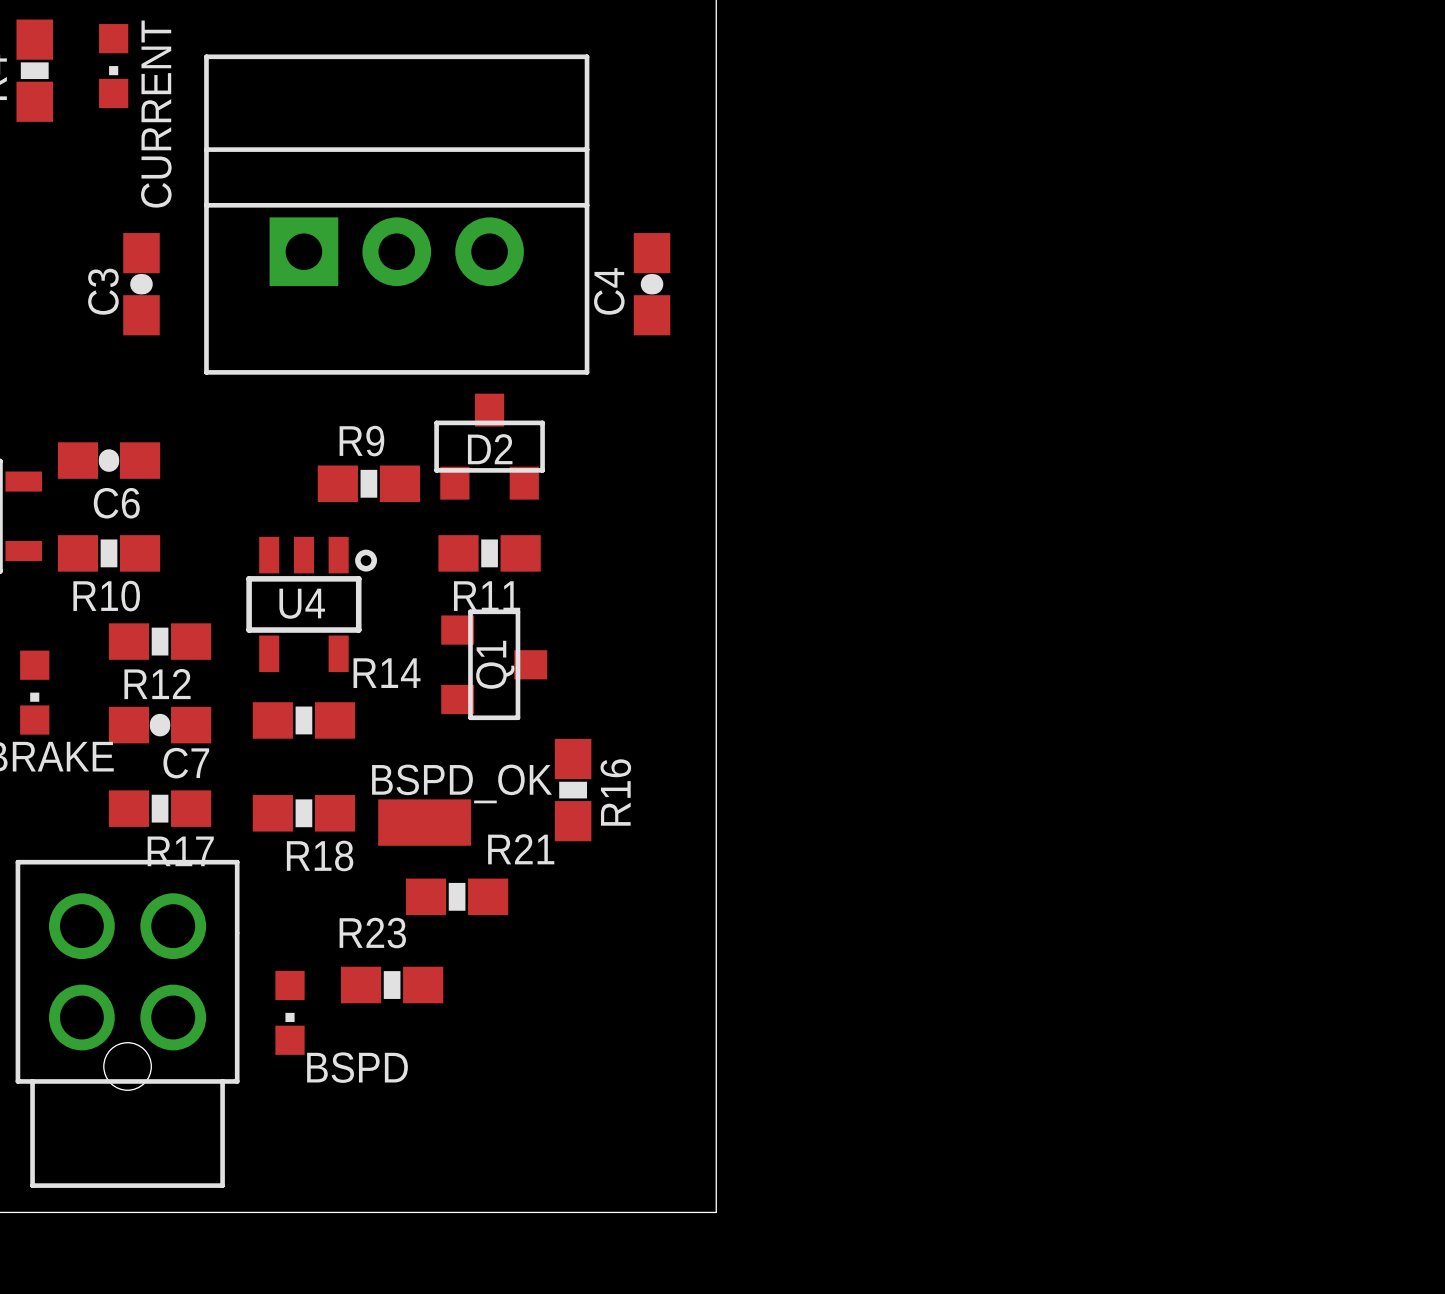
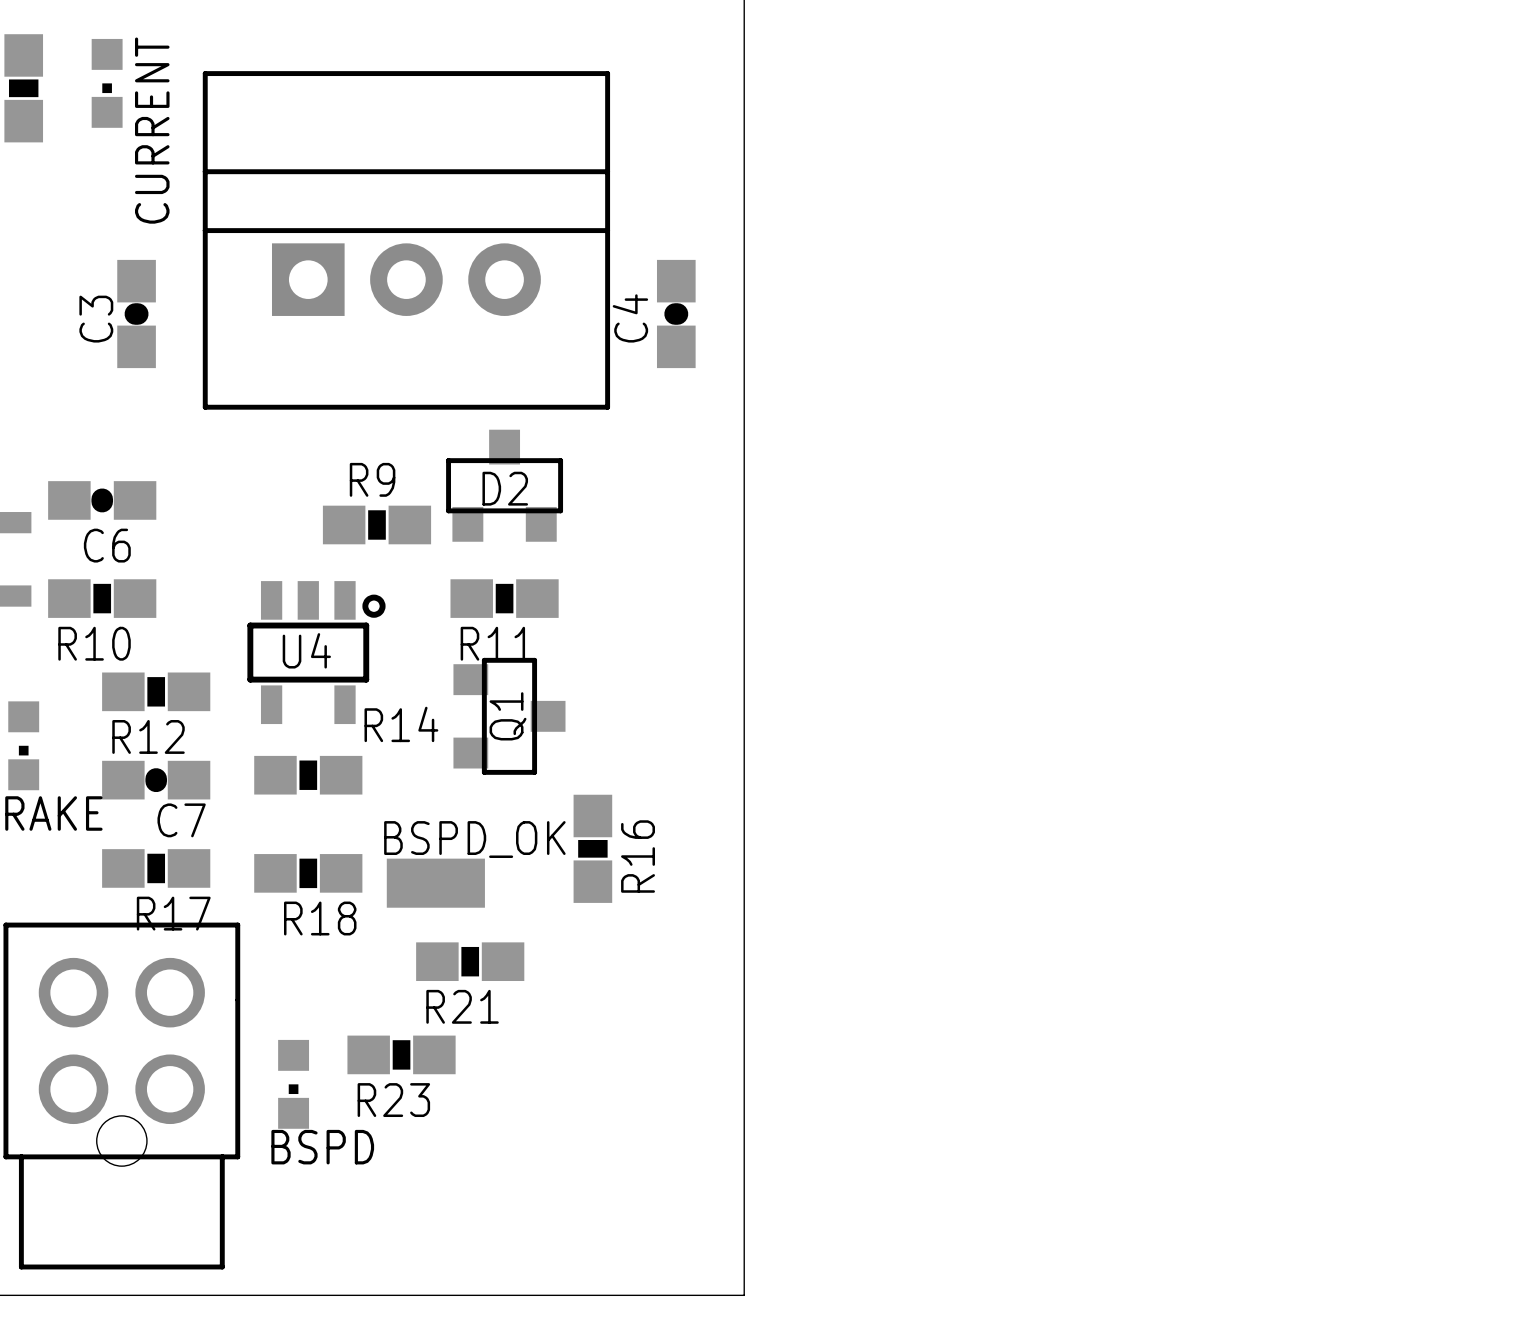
R21 name position: R21 (521, 849) -> R21 (462, 1006)
R23 name position: R23 (372, 933) -> R23 (393, 1100)
BSPD name position: BSPD (357, 1067) -> BSPD (322, 1147)

